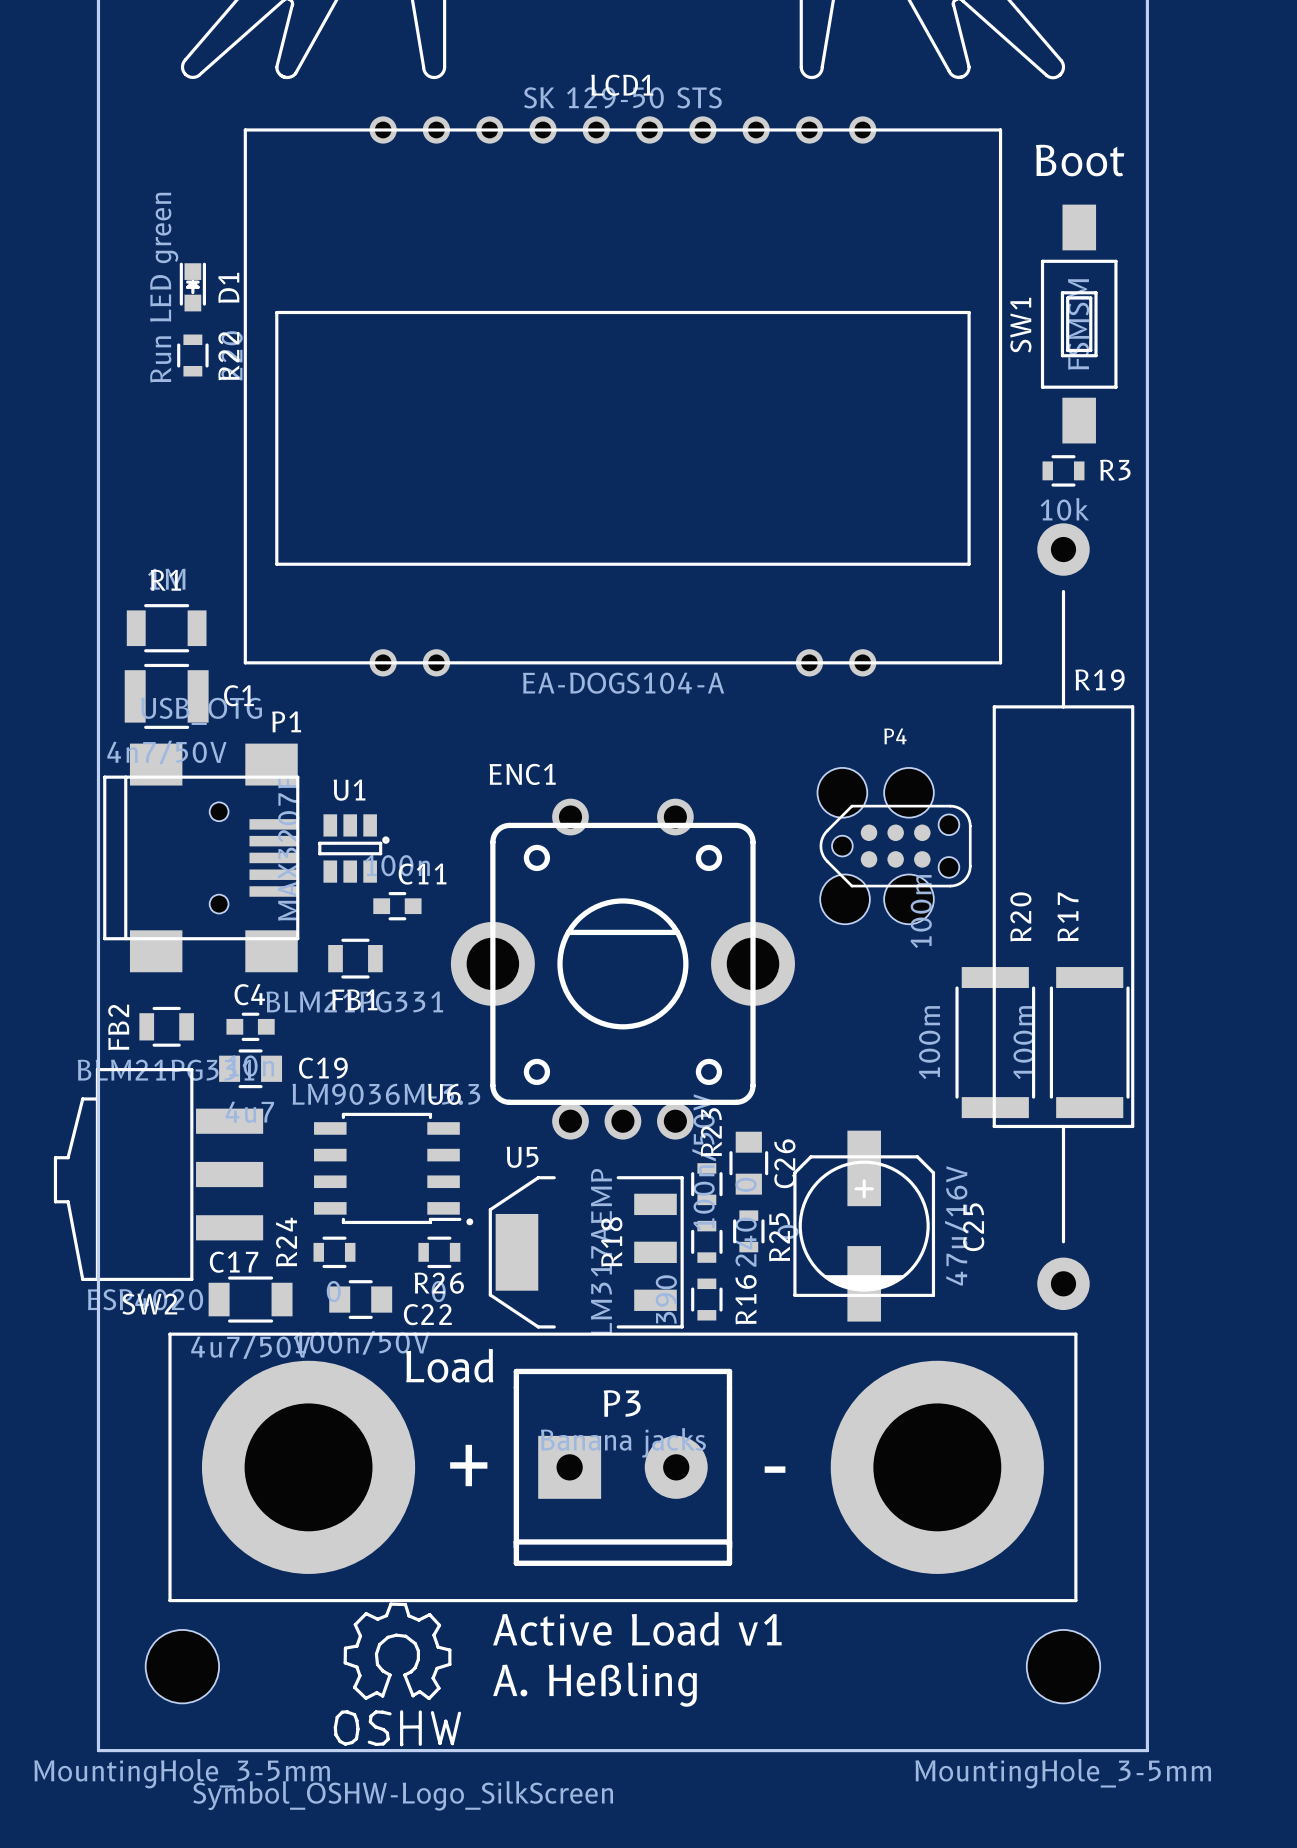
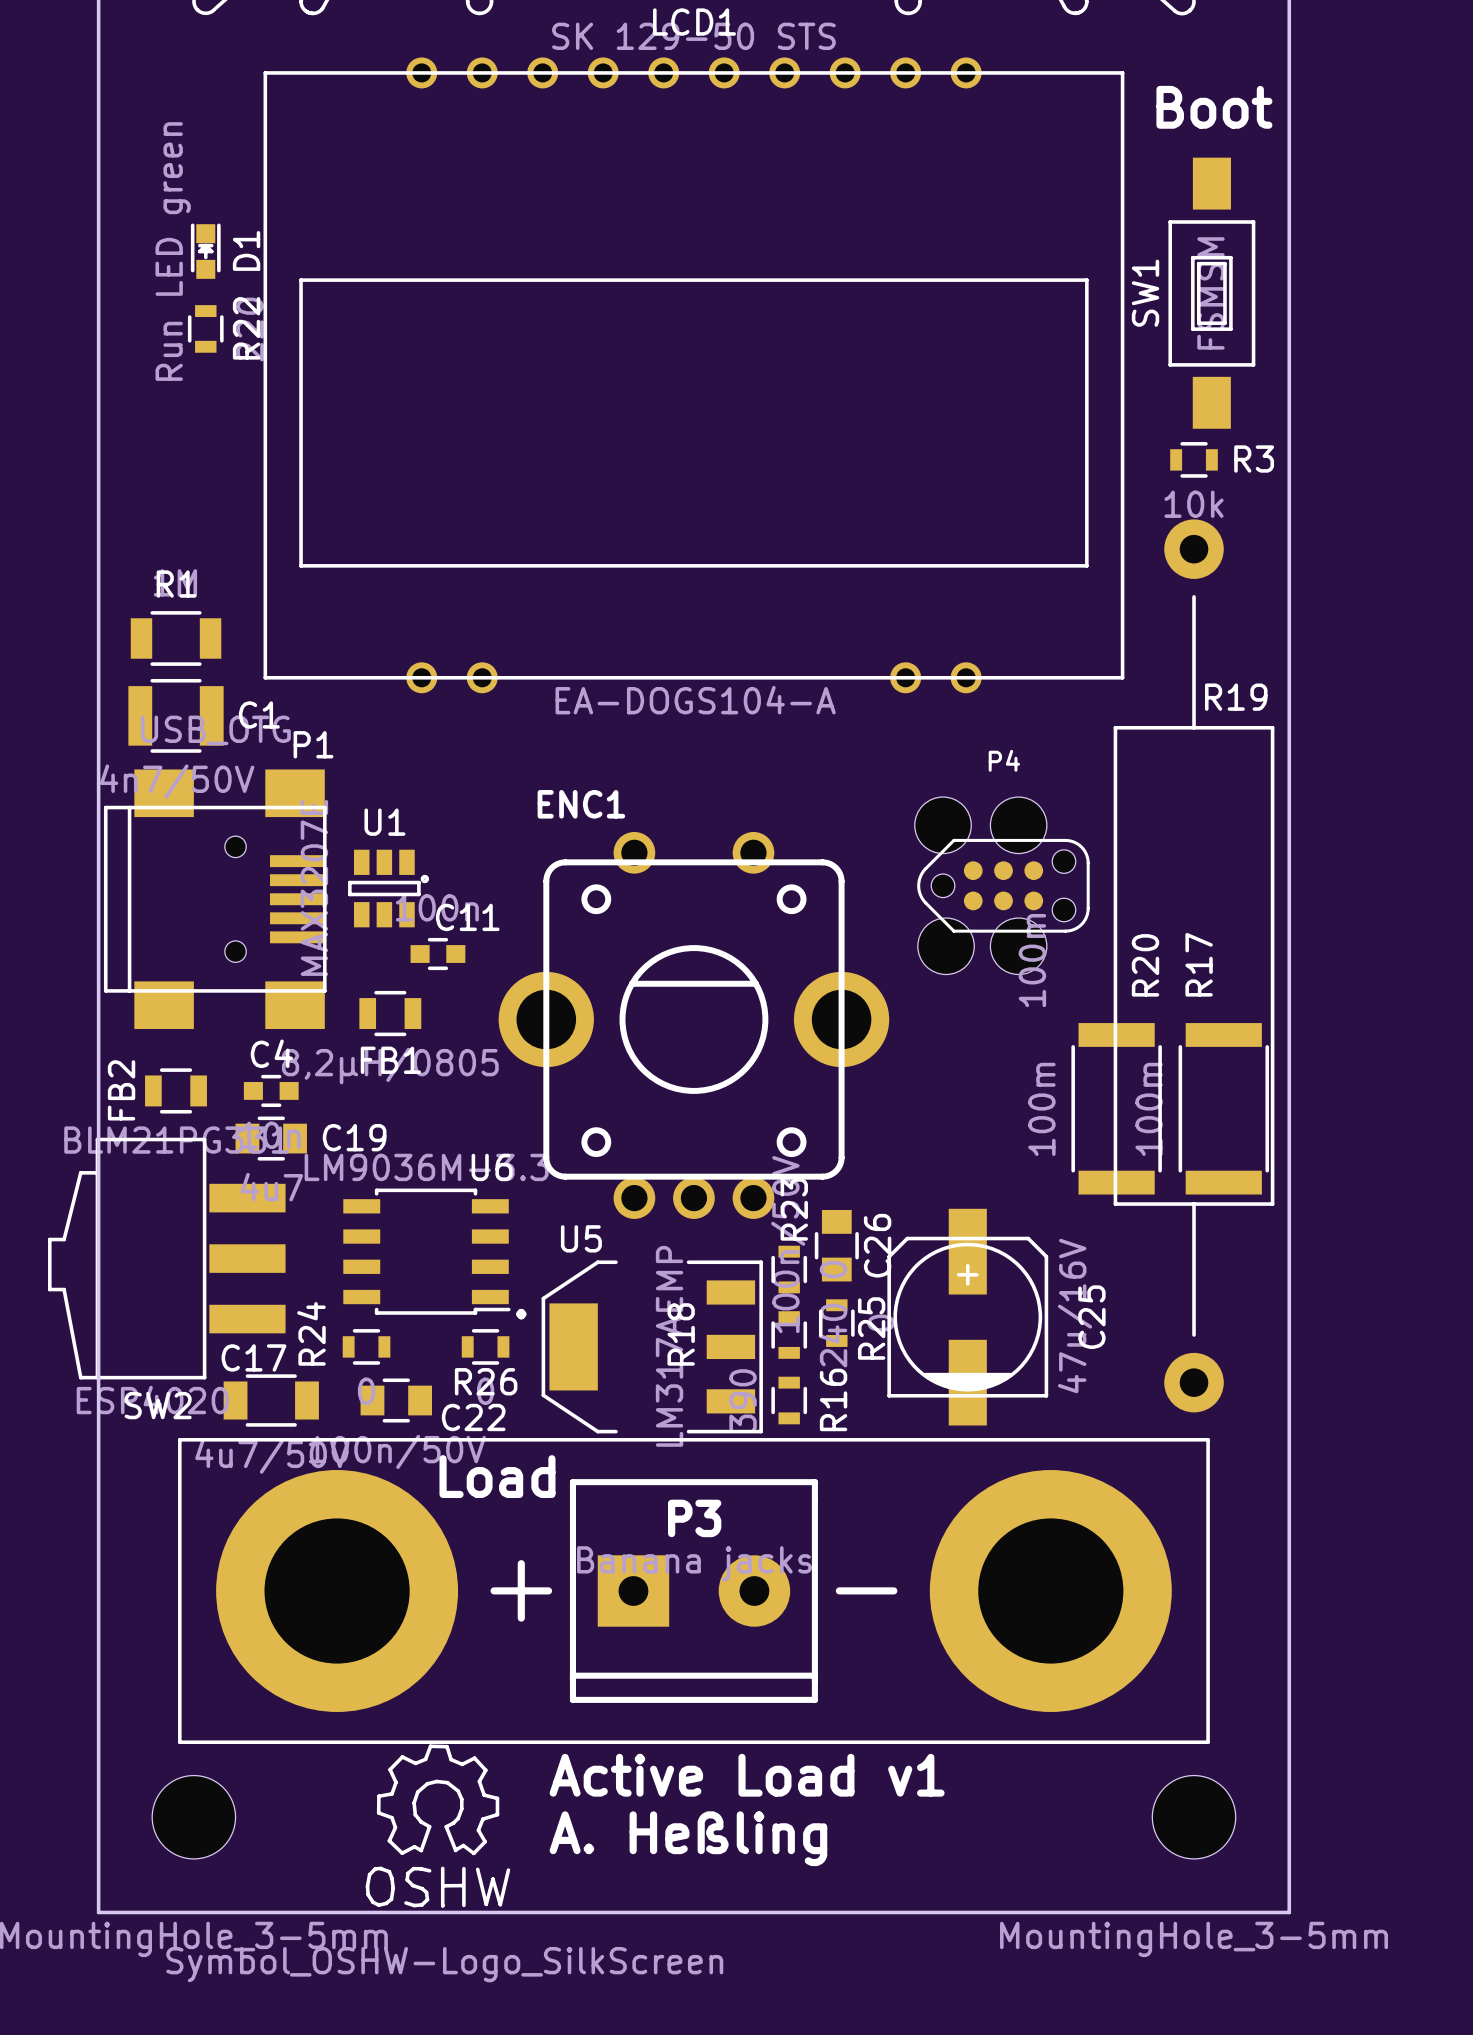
FB1 value: BLM21PG331 (354, 1002) -> 8,2µH/0805 (390, 1066)

